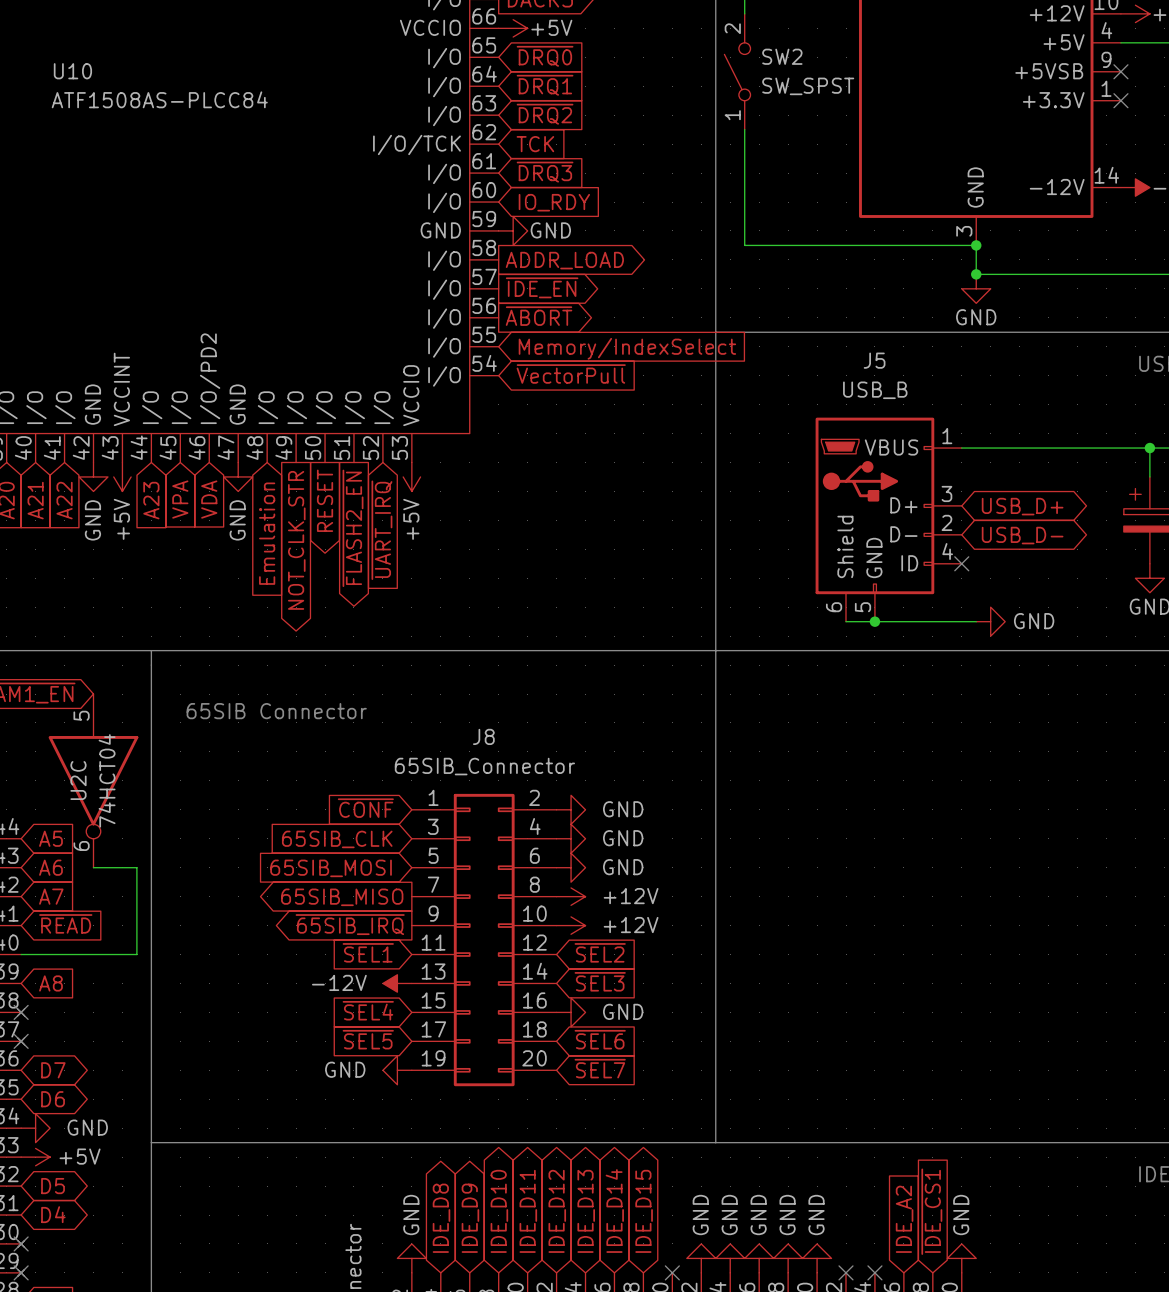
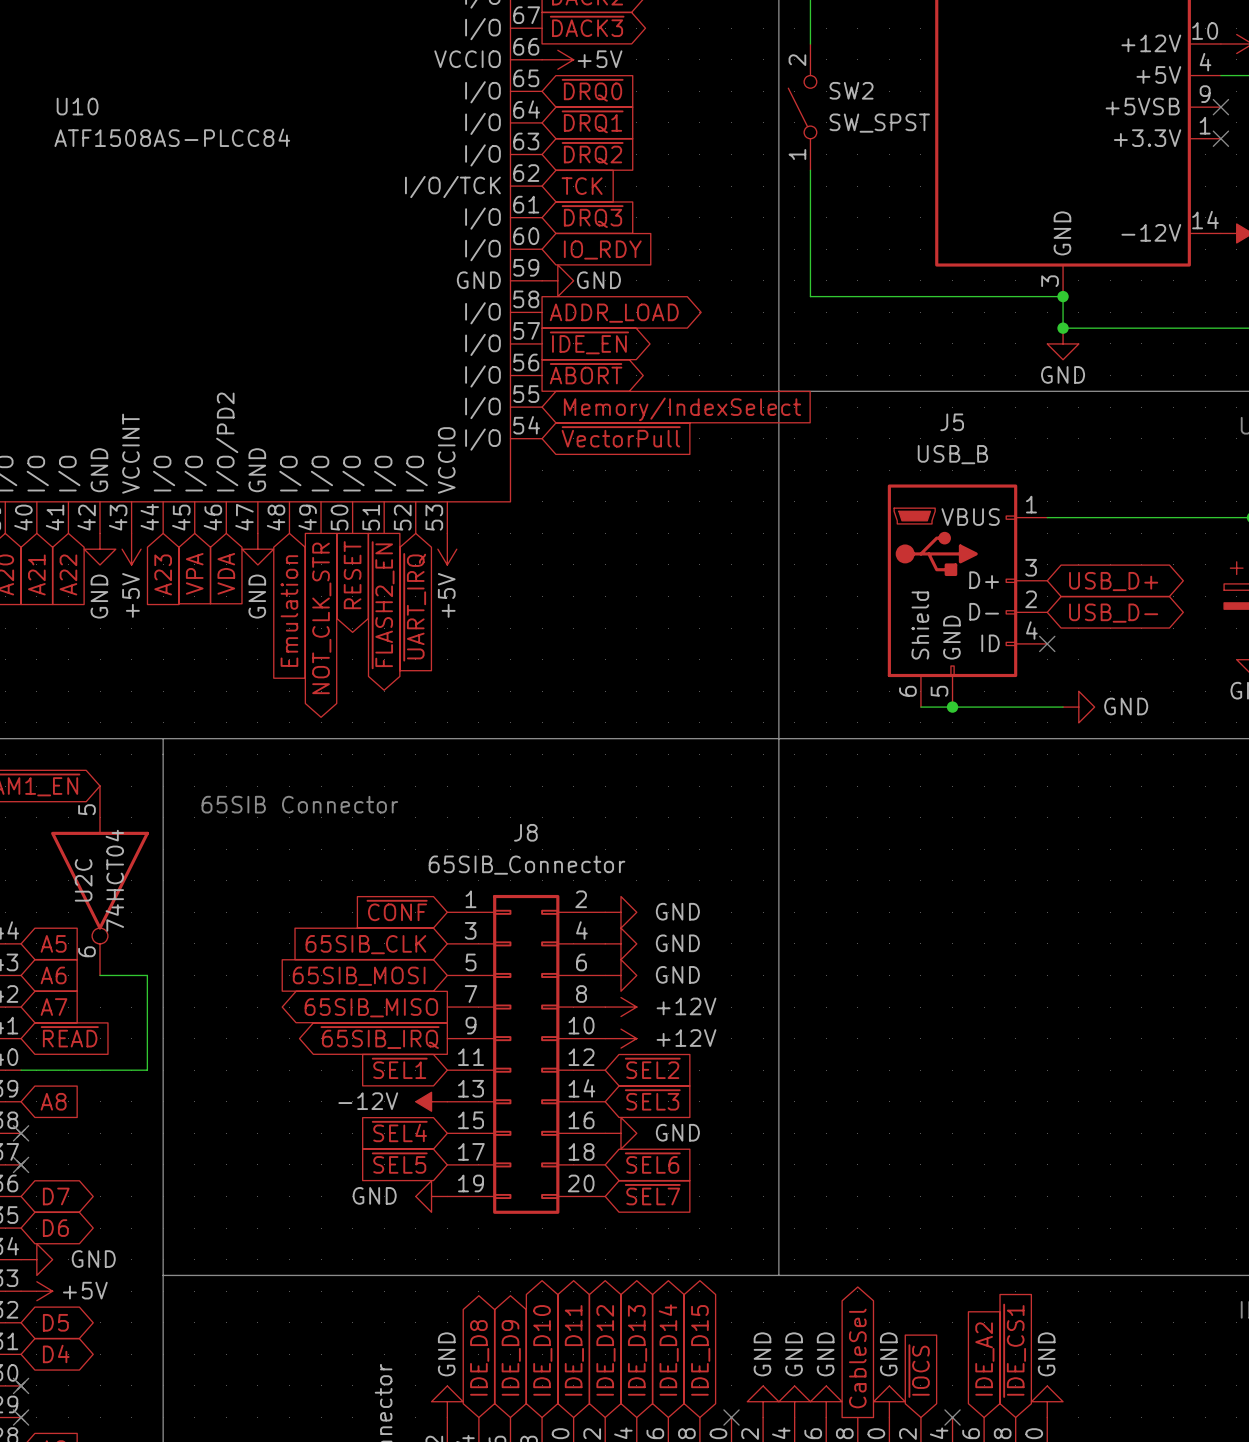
global label: none -> CableSel (857, 1358)
global label: none -> ~{IOCS} (919, 1371)
power symbol: GND (788, 1258) -> none
no-connect mark: (846, 1272) -> none

